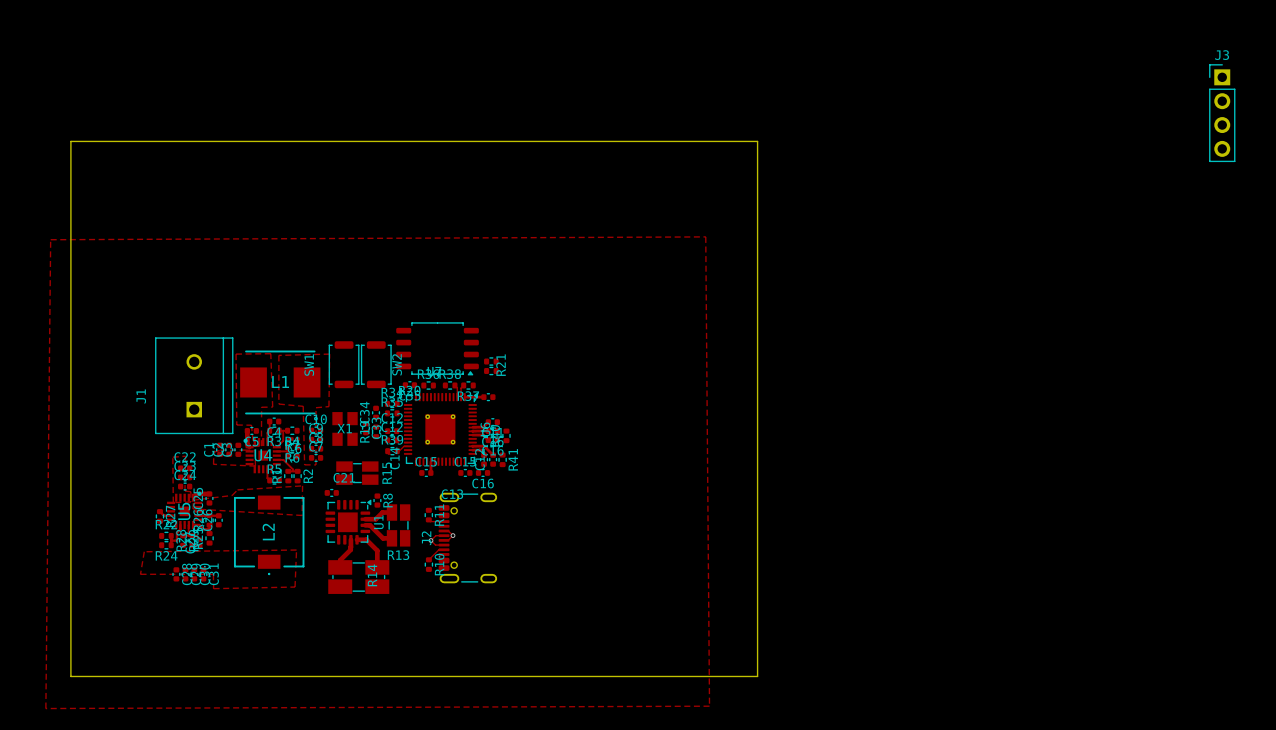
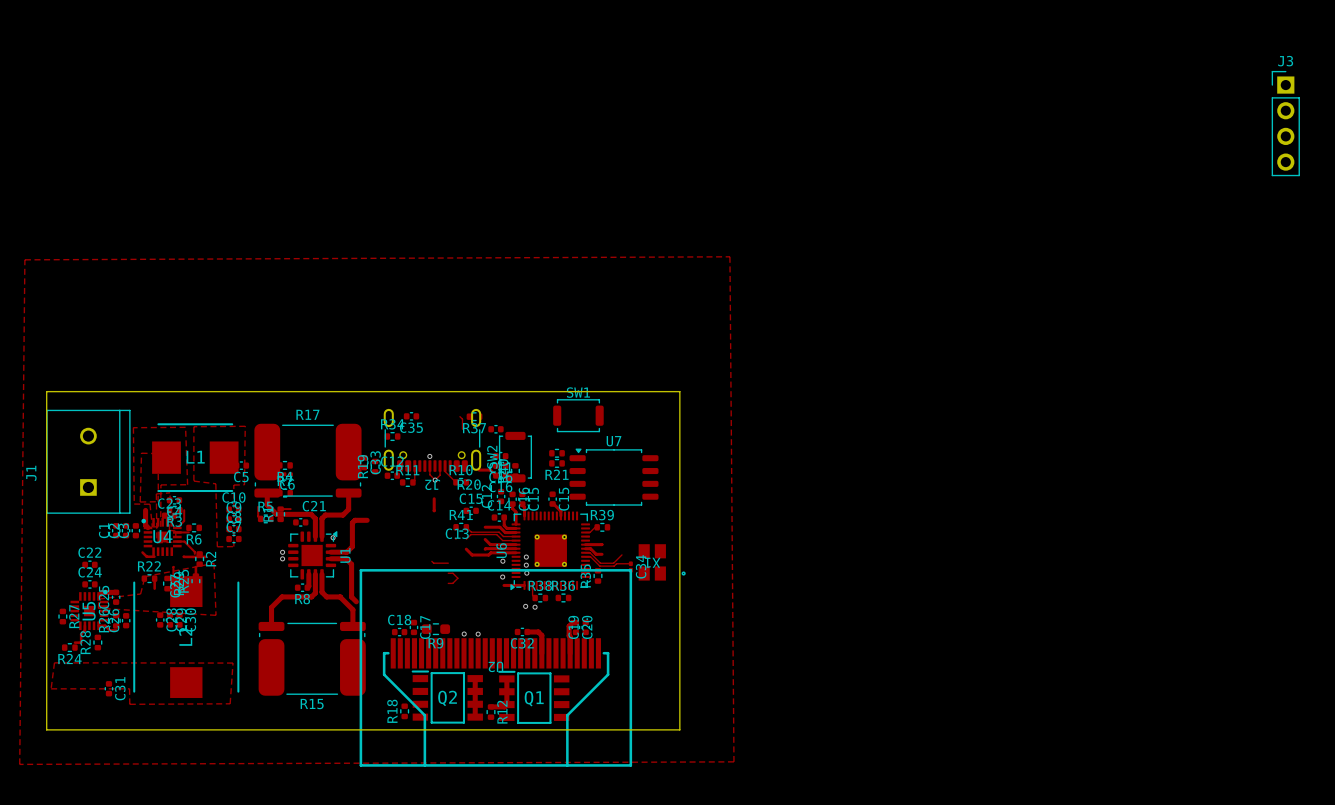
U7 rotation: 0° (437, 348) -> 180° (614, 477)
U7 position: (437, 348) -> (614, 477)
zone outline: (270, 353) (272, 407) (261, 407) (261, 446) (253, 446) (251, 425) (236, 425) (236, 354) (270, 353) -> none
zone outline: (329, 354) (328, 406) (315, 407) (315, 464) (304, 464) (303, 406) (278, 404) (278, 355) (329, 354) -> none
R20 position: (491, 361) -> (557, 453)
board edge: (70, 362) (70, 141) (757, 141) (757, 676) (659, 676) -> (46, 391) (679, 391) (679, 729)
SW1 rotation: 0° (344, 364) -> 90° clockwise (578, 415)
SW1 position: (344, 364) -> (578, 415)
SW2 position: (376, 364) -> (515, 457)
SW2 name position: SW2 (397, 364) -> SW2 (492, 457)
R21 name rotation: 0° (501, 365) -> 90° clockwise (557, 474)
R21 position: (491, 371) -> (557, 463)
L1 position: (280, 382) -> (195, 457)
J1 position: (194, 385) -> (88, 461)
R36 position: (428, 385) -> (563, 597)
R38 position: (450, 385) -> (540, 598)
track: (463, 385) (461, 388) (461, 397) -> none
zone outline: none -> (245, 426) (244, 484) (233, 485) (233, 546) (217, 546) (215, 483) (193, 481) (193, 426) (245, 426)
zone outline: none -> (185, 427) (187, 484) (160, 484) (160, 526) (152, 526) (150, 504) (134, 504) (133, 427) (185, 427)
track: (464, 397) (483, 397) -> (503, 585) (524, 585)
C34 footprint: [372, 405, 380, 420] -> [628, 561, 633, 573]
C34 name position: C34 (364, 412) -> C34 (641, 566)
R35 rotation: 0° (392, 413) -> 90° clockwise (597, 575)
R35 position: (392, 413) -> (597, 575)
zone outline: none -> (141, 453) (155, 453) (158, 464) (158, 501) (140, 502) (141, 453)
C4 position: (274, 421) -> (174, 500)
via: none -> (429, 456)
track: (488, 422) (483, 427) (473, 427) -> none
R17: none -> (307, 460)
X1 rotation: 0° (335, 428) -> 180° (662, 562)
X1 position: (335, 428) -> (662, 562)
U6 rotation: 0° (440, 429) -> 180° (550, 550)
U6 position: (440, 429) -> (550, 550)
track: (247, 430) (247, 444) (249, 446) -> (145, 510) (145, 525) (148, 527)
R3 position: (274, 430) -> (174, 510)
track: (283, 430) (283, 440) (276, 447) -> (184, 510) (184, 521) (177, 527)
C10 position: (316, 430) -> (233, 509)
C12: (392, 431) -> none
track: none -> (414, 466) (414, 480) (412, 482)
track: none -> (429, 466) (429, 474) (435, 480) (440, 475) (440, 466)
track: none -> (445, 466) (445, 471) (455, 482)
track: (488, 431) (472, 431) -> none
C9 position: (316, 439) -> (233, 519)
via: none -> (435, 480)
track: (408, 446) (403, 446) (399, 451) -> none
track: (472, 446) (484, 446) (493, 455) -> none
R6 position: (292, 447) -> (194, 527)
C8 position: (316, 448) -> (233, 529)
C1 position: (220, 449) -> (116, 530)
C2 position: (229, 449) -> (126, 530)
C3 position: (238, 449) -> (135, 530)
zone outline: (244, 450) (220, 450) (213, 452) (213, 464) (255, 466) (255, 450) (244, 450) -> none
track: (276, 451) (287, 451) -> (177, 532) (188, 532)
R39 position: (392, 451) -> (602, 527)
track: (388, 454) (390, 454) -> none
U4 position: (262, 455) -> (161, 537)
track: none -> (267, 493) (267, 504) (276, 514) (311, 514) (315, 518) (315, 536)
track: none -> (348, 493) (348, 509) (342, 515) (325, 515) (321, 518) (321, 536)
C7 position: (316, 457) -> (233, 539)
C14 name position: C14 (394, 458) -> C14 (499, 505)
track: (276, 459) (283, 459) (293, 471) -> (177, 541) (184, 541) (194, 553)
C14 rotation: 0° (484, 459) -> 90° clockwise (499, 517)
C14 position: (484, 459) -> (499, 517)
R41 rotation: 0° (502, 459) -> 90° clockwise (461, 527)
R41 position: (502, 459) -> (461, 527)
R15 footprint: [336, 461, 379, 485] -> [258, 621, 366, 696]
C15: none -> (522, 499)
C15: none -> (552, 499)
track: none -> (512, 504) (512, 508) (516, 512) (516, 524)
track: none -> (522, 504) (524, 515)
track: none -> (552, 503) (560, 511) (560, 515)
C22 position: (185, 468) -> (89, 564)
C15: (426, 472) -> none
C16 rotation: 0° (483, 472) -> 90° clockwise (512, 499)
C16 position: (483, 472) -> (512, 499)
R15 name position: R15 (387, 473) -> R15 (312, 704)
R2 position: (297, 476) -> (199, 559)
track: none -> (504, 517) (504, 525) (507, 528) (516, 528)
track: none -> (367, 520) (355, 520) (352, 522) (352, 546) (346, 552) (330, 552)
zone outline: (302, 485) (237, 489) (232, 495) (193, 500) (192, 508) (302, 515) (302, 485) -> none
C24 position: (185, 486) -> (89, 584)
track: none -> (466, 527) (471, 532) (499, 532) (503, 536) (516, 536)
track: none -> (485, 527) (499, 527) (505, 532) (515, 532)
track: none -> (597, 527) (589, 532) (585, 532)
C21 position: (331, 492) -> (300, 522)
track: (209, 493) (196, 493) (194, 496) -> (116, 592) (102, 592) (99, 595)
L2 footprint: [233, 495, 305, 575] -> [133, 576, 240, 698]
via: none -> (333, 537)
C25 position: (209, 498) -> (116, 597)
track: none -> (455, 538) (456, 539)
track: none -> (466, 539) (471, 534) (496, 534) (502, 540) (516, 540)
track: none -> (485, 539) (490, 544) (516, 544)
R8 rotation: 0° (377, 500) -> 90° clockwise (302, 587)
R8 position: (377, 500) -> (302, 587)
track: none -> (585, 544) (601, 544)
track: none -> (466, 549) (472, 555) (516, 552)
track: none -> (516, 548) (485, 549)
track: none -> (585, 548) (590, 548) (596, 554) (602, 554)
U5 position: (184, 510) -> (89, 609)
via: none -> (282, 552)
track: none -> (585, 552) (589, 552) (600, 563) (613, 563) (621, 554)
track: (391, 512) (382, 512) (375, 519) (365, 519) -> none
R11 rotation: 0° (428, 515) -> 90° clockwise (407, 482)
R11 position: (428, 515) -> (407, 482)
via: none -> (526, 557)
track: none -> (585, 556) (590, 556) (599, 566) (630, 563)
R27 position: (159, 516) -> (62, 616)
via: none -> (282, 558)
track: none -> (330, 558) (346, 558) (351, 564) (351, 597) (356, 601)
via: none -> (502, 561)
R26 position: (209, 520) -> (116, 620)
C26 position: (218, 520) -> (126, 620)
zone outline: none -> (214, 563) (216, 615) (98, 608) (98, 599) (140, 594) (145, 576) (214, 563)
U1 position: (348, 522) -> (312, 555)
via: none -> (526, 565)
track: (180, 524) (180, 529) (176, 532) (176, 540) (171, 540) -> (84, 625) (84, 630) (81, 634) (81, 642) (74, 642)
track: (193, 524) (199, 524) (203, 529) (209, 529) -> (98, 625) (105, 625) (109, 630) (116, 630)
track: (365, 525) (370, 525) (383, 538) (391, 538) -> none
R13: (398, 525) -> none
via: none -> (526, 573)
track: none -> (308, 574) (307, 587)
track: none -> (315, 574) (315, 593) (311, 596) (282, 596) (271, 607) (271, 626)
track: none -> (321, 574) (321, 592) (326, 596) (340, 596) (352, 609) (352, 626)
via: none -> (502, 577)
track: (444, 535) (435, 535) (431, 540) (435, 545) (444, 545) -> none
via: (452, 535) -> none
J2 rotation: 0° (467, 538) -> 90° counterclockwise (432, 440)
J2 position: (467, 538) -> (432, 440)
track: (350, 539) (350, 549) (340, 560) (340, 567) -> none
track: (357, 539) (366, 539) (377, 550) (377, 567) -> none
R28 position: (192, 540) -> (97, 642)
via: (431, 540) -> none
track: none -> (532, 585) (532, 595) (535, 598)
R24 position: (166, 545) -> (69, 647)
track: (444, 549) (438, 549) (428, 559) -> none
zone outline: (296, 550) (295, 587) (213, 588) (213, 574) (140, 574) (144, 551) (296, 550) -> none
via: none -> (525, 606)
via: none -> (535, 607)
R10 rotation: 0° (428, 564) -> 90° clockwise (461, 482)
R10 position: (428, 564) -> (461, 482)
C31 position: (203, 574) -> (108, 688)
track: none -> (575, 622) (569, 626) (570, 653)
R14: (358, 577) -> none
C17: none -> (413, 627)
C20: none -> (575, 627)
C19: none -> (585, 627)
R9: none -> (435, 629)
C18: none -> (399, 632)
C32: none -> (522, 631)
track: none -> (527, 631) (538, 631) (541, 635) (541, 653)
via: none -> (464, 634)
via: none -> (478, 634)
zone outline: none -> (54, 662) (51, 688) (129, 688) (129, 704) (230, 703) (233, 663) (54, 662)
U2: none -> (495, 667)
track: none -> (475, 678) (475, 717)
track: none -> (506, 678) (506, 704) (504, 706) (490, 706)
Q2: none -> (447, 697)
Q1: none -> (533, 697)
R18: none -> (404, 711)
R12: none -> (490, 712)

